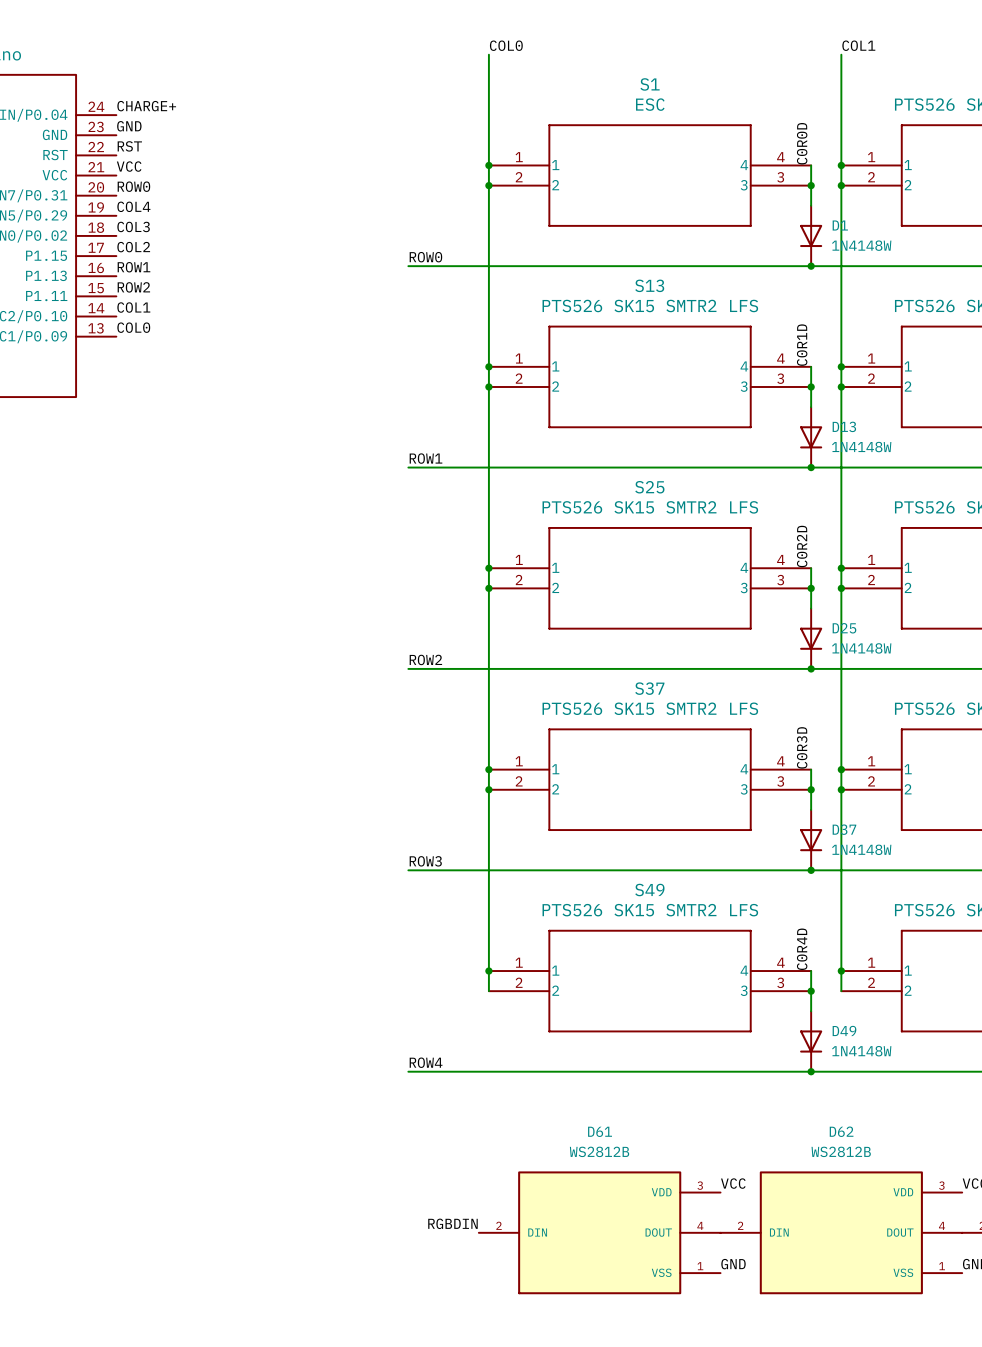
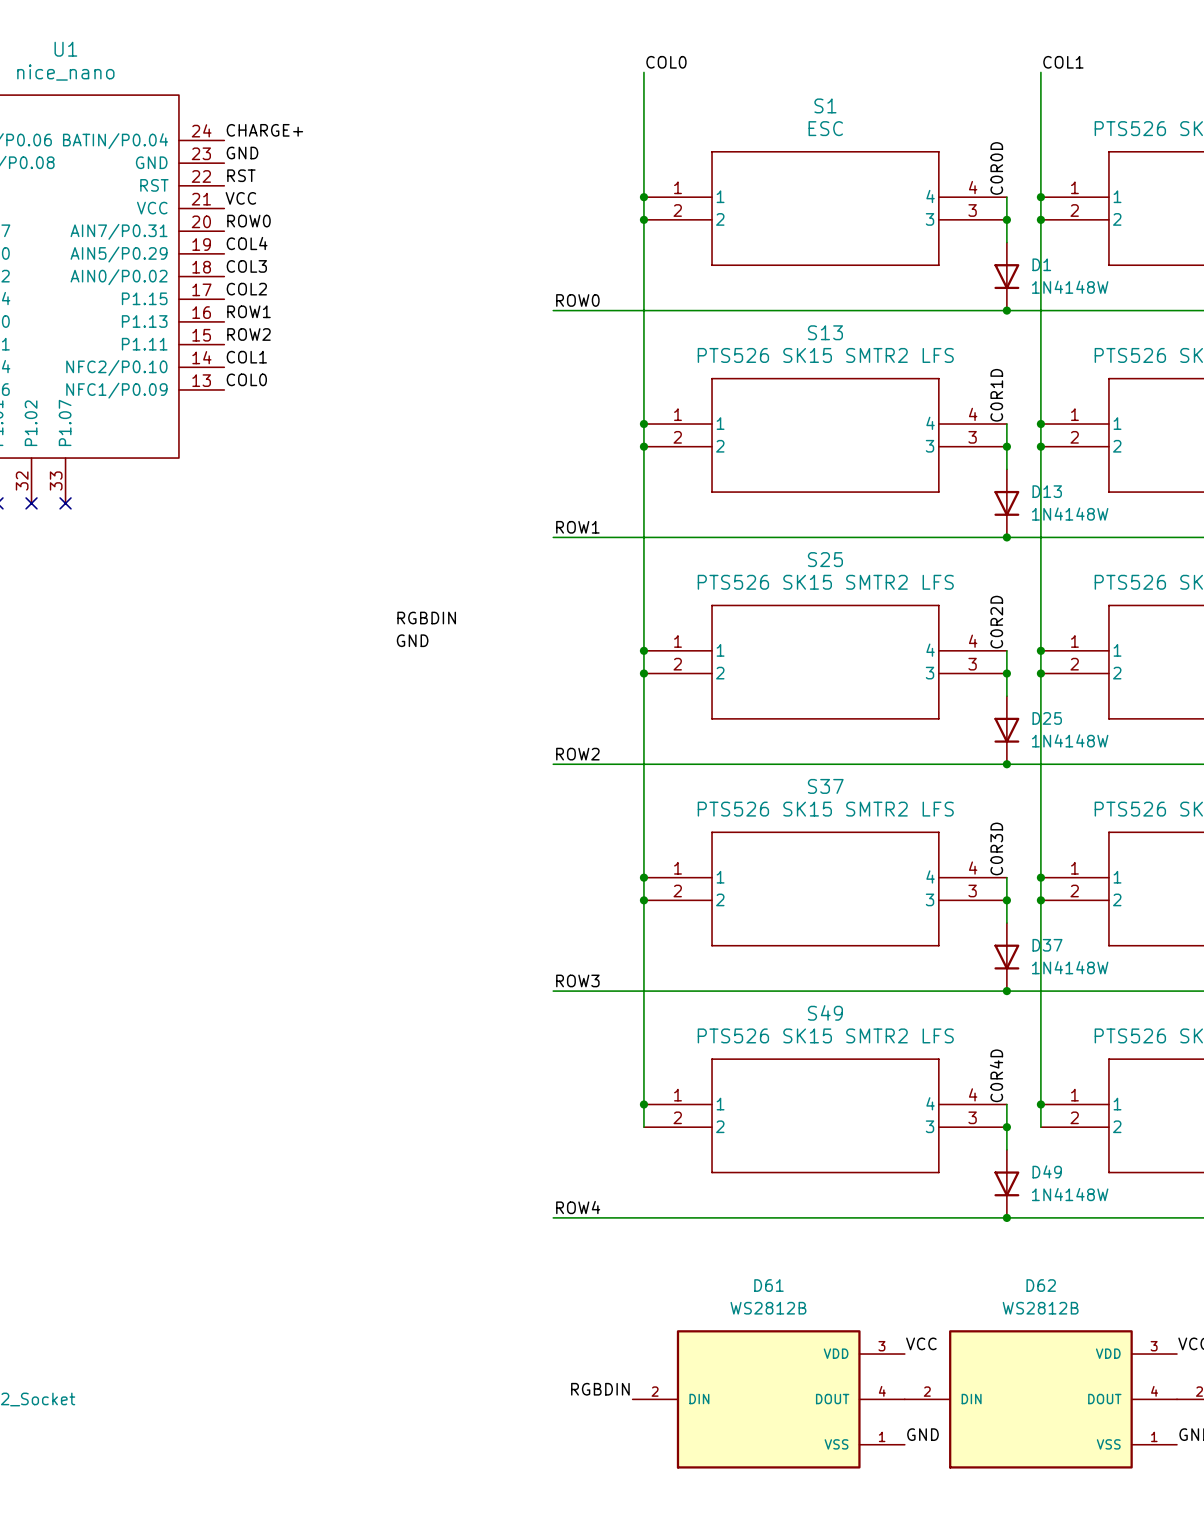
label: none -> RGBDIN (426, 618)
label: none -> GND (412, 640)

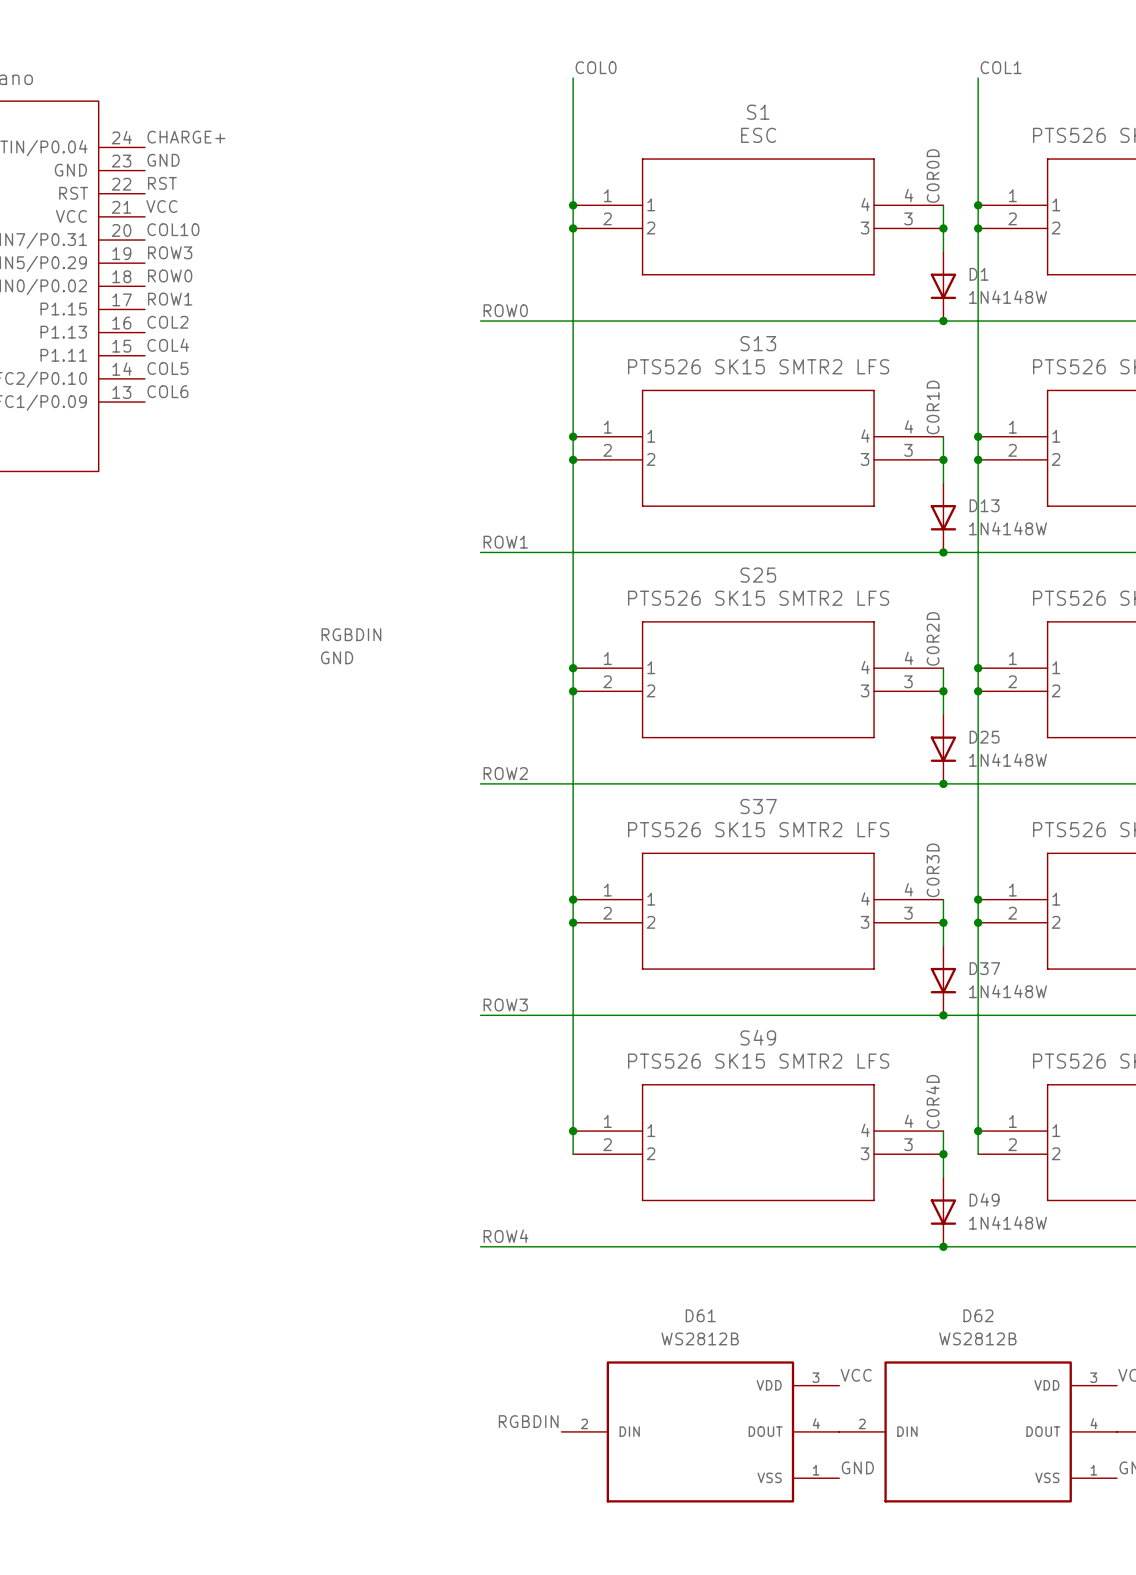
label: ROW0 (248, 221) -> COL10 (173, 229)
label: COL4 (247, 243) -> ROW3 (170, 252)
label: COL3 (246, 266) -> ROW0 (170, 275)
label: COL2 (246, 289) -> ROW1 (170, 299)
label: ROW1 (248, 311) -> COL2 (167, 322)
label: ROW2 (248, 334) -> COL4 (168, 345)
label: COL1 (246, 357) -> COL5 (167, 368)
label: COL0 (246, 379) -> COL6 (167, 391)

